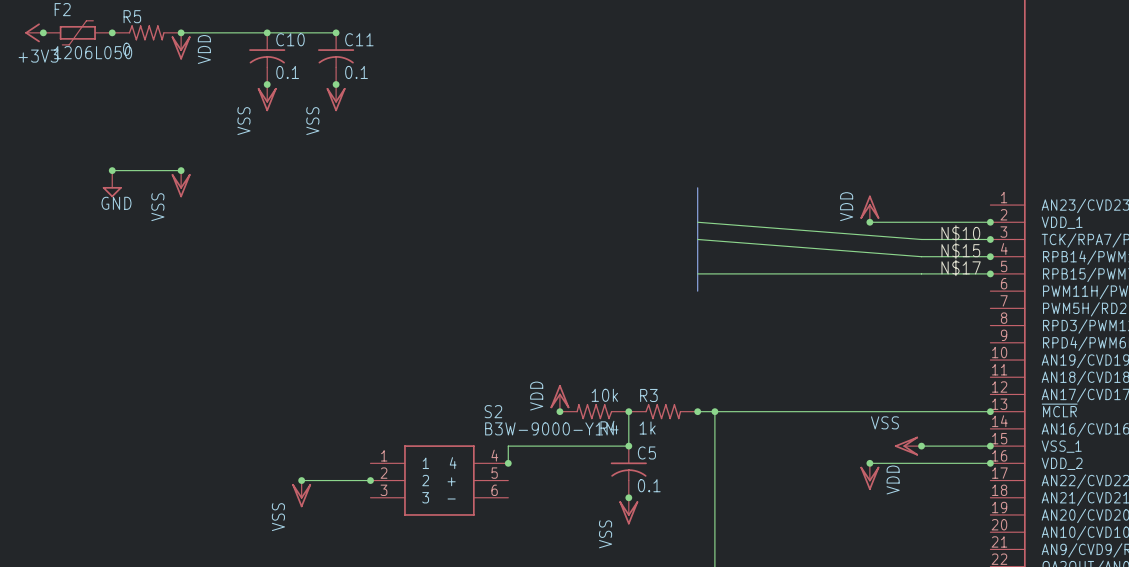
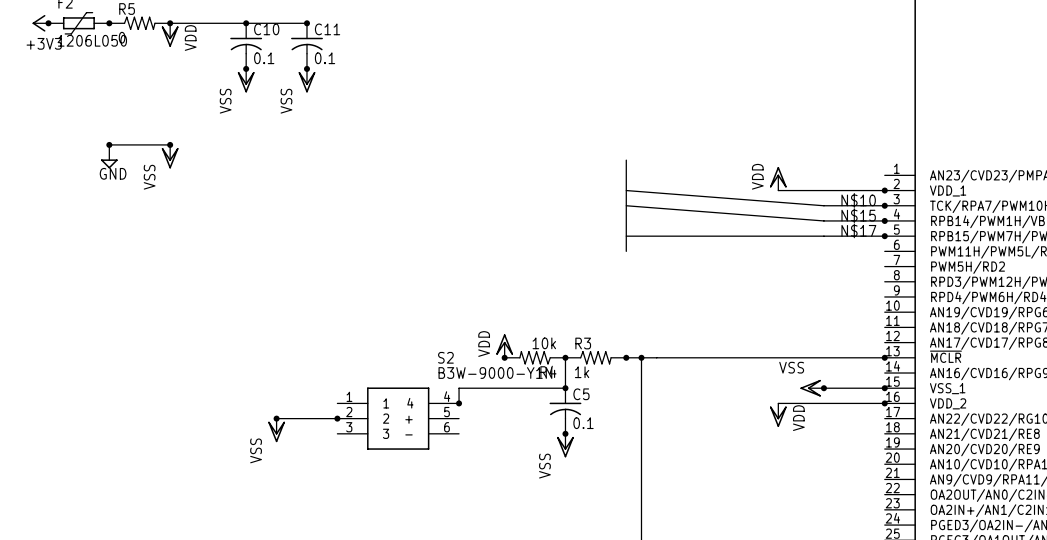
junction: (869, 222) -> none
junction: (869, 463) -> none

